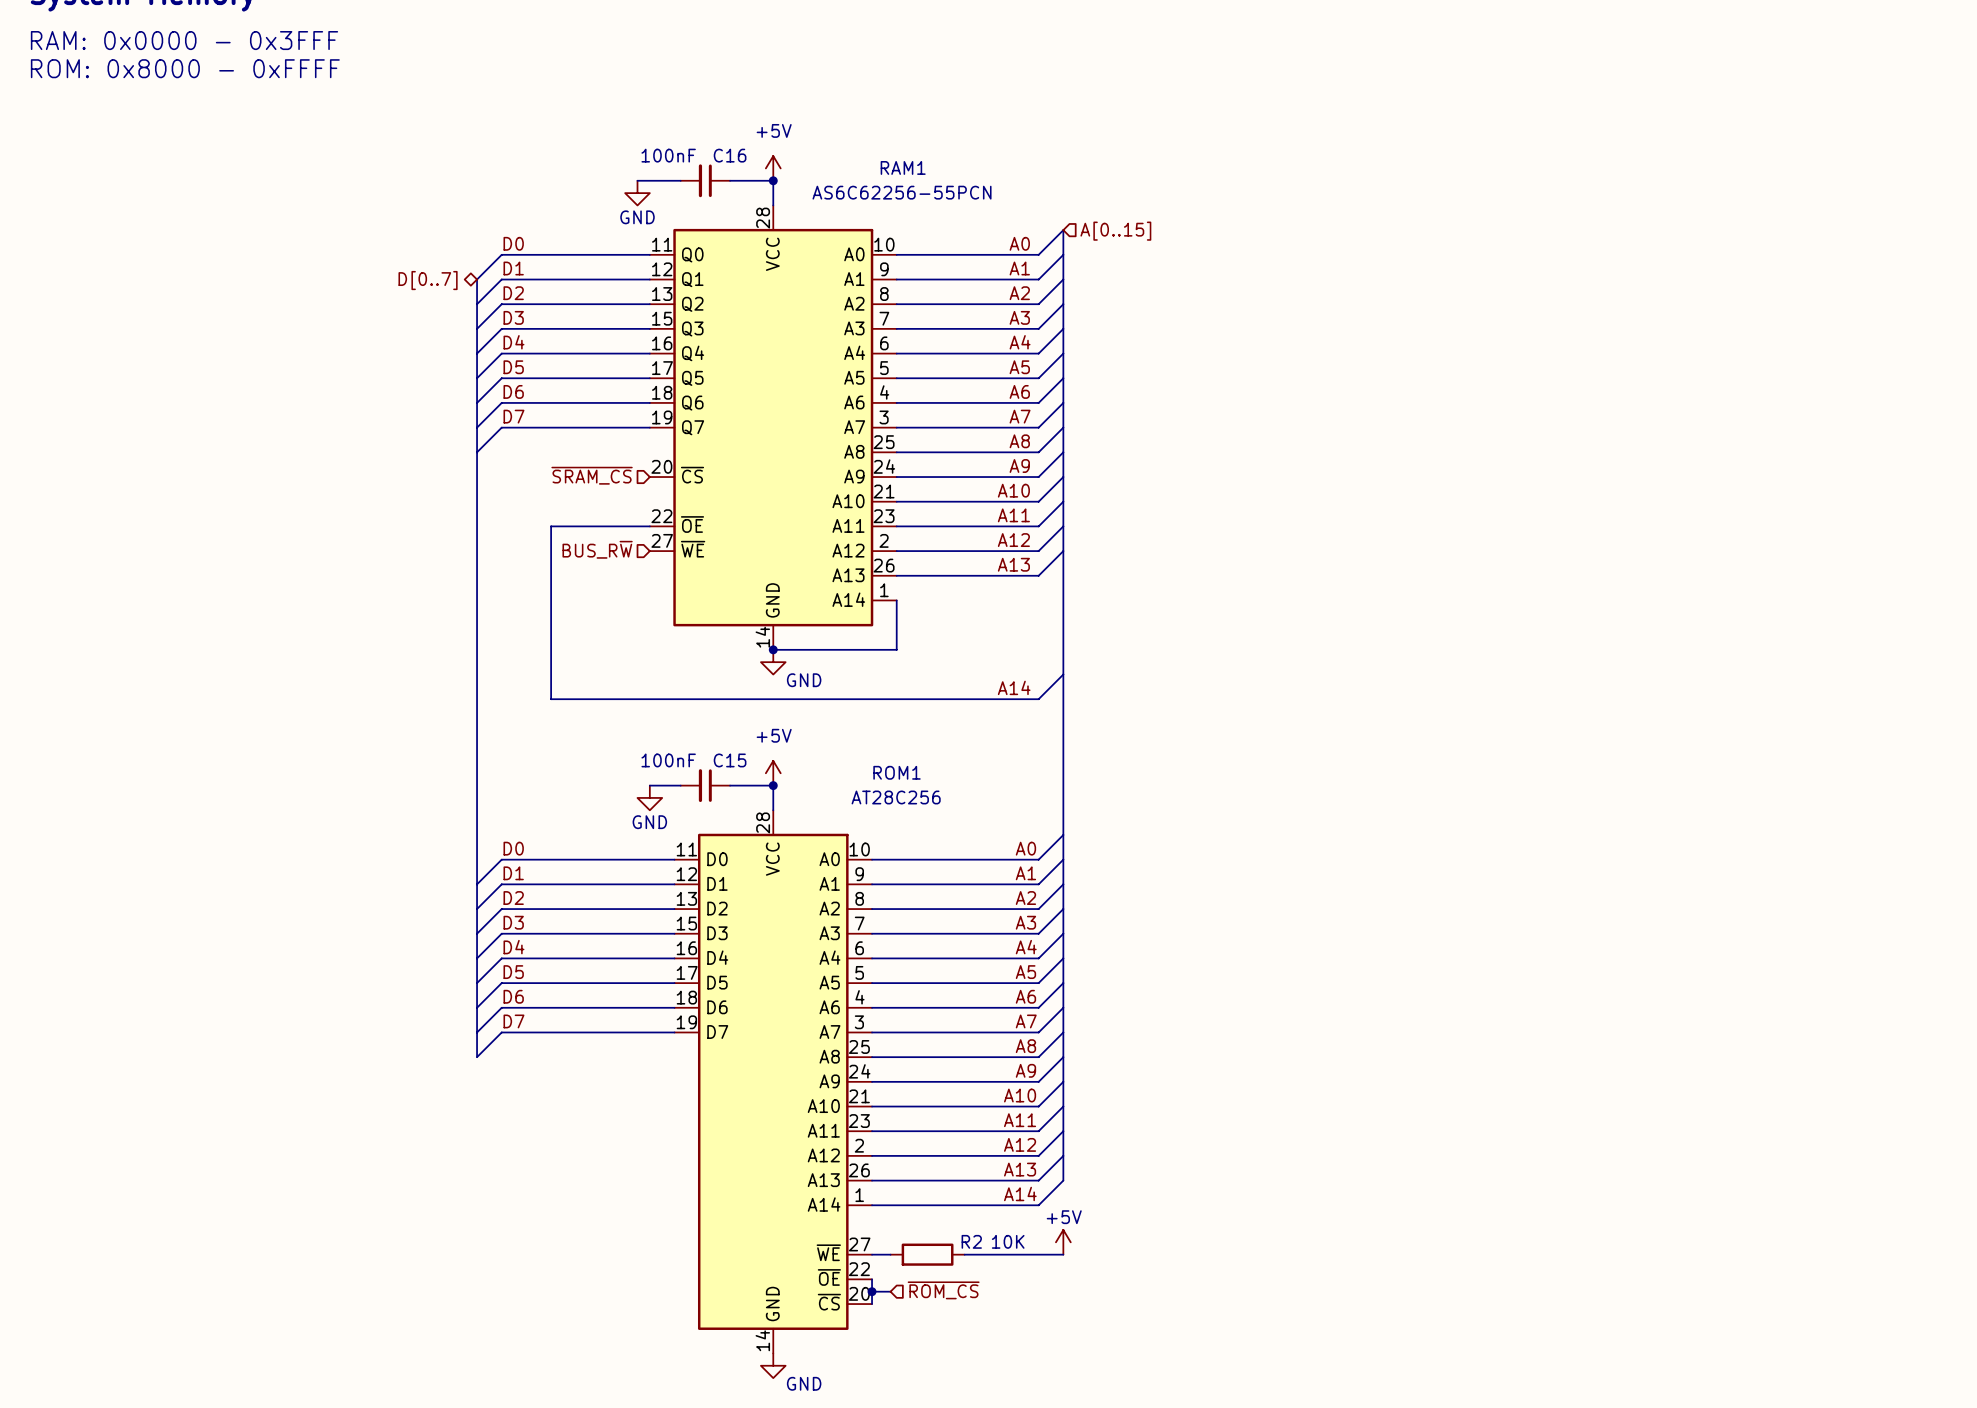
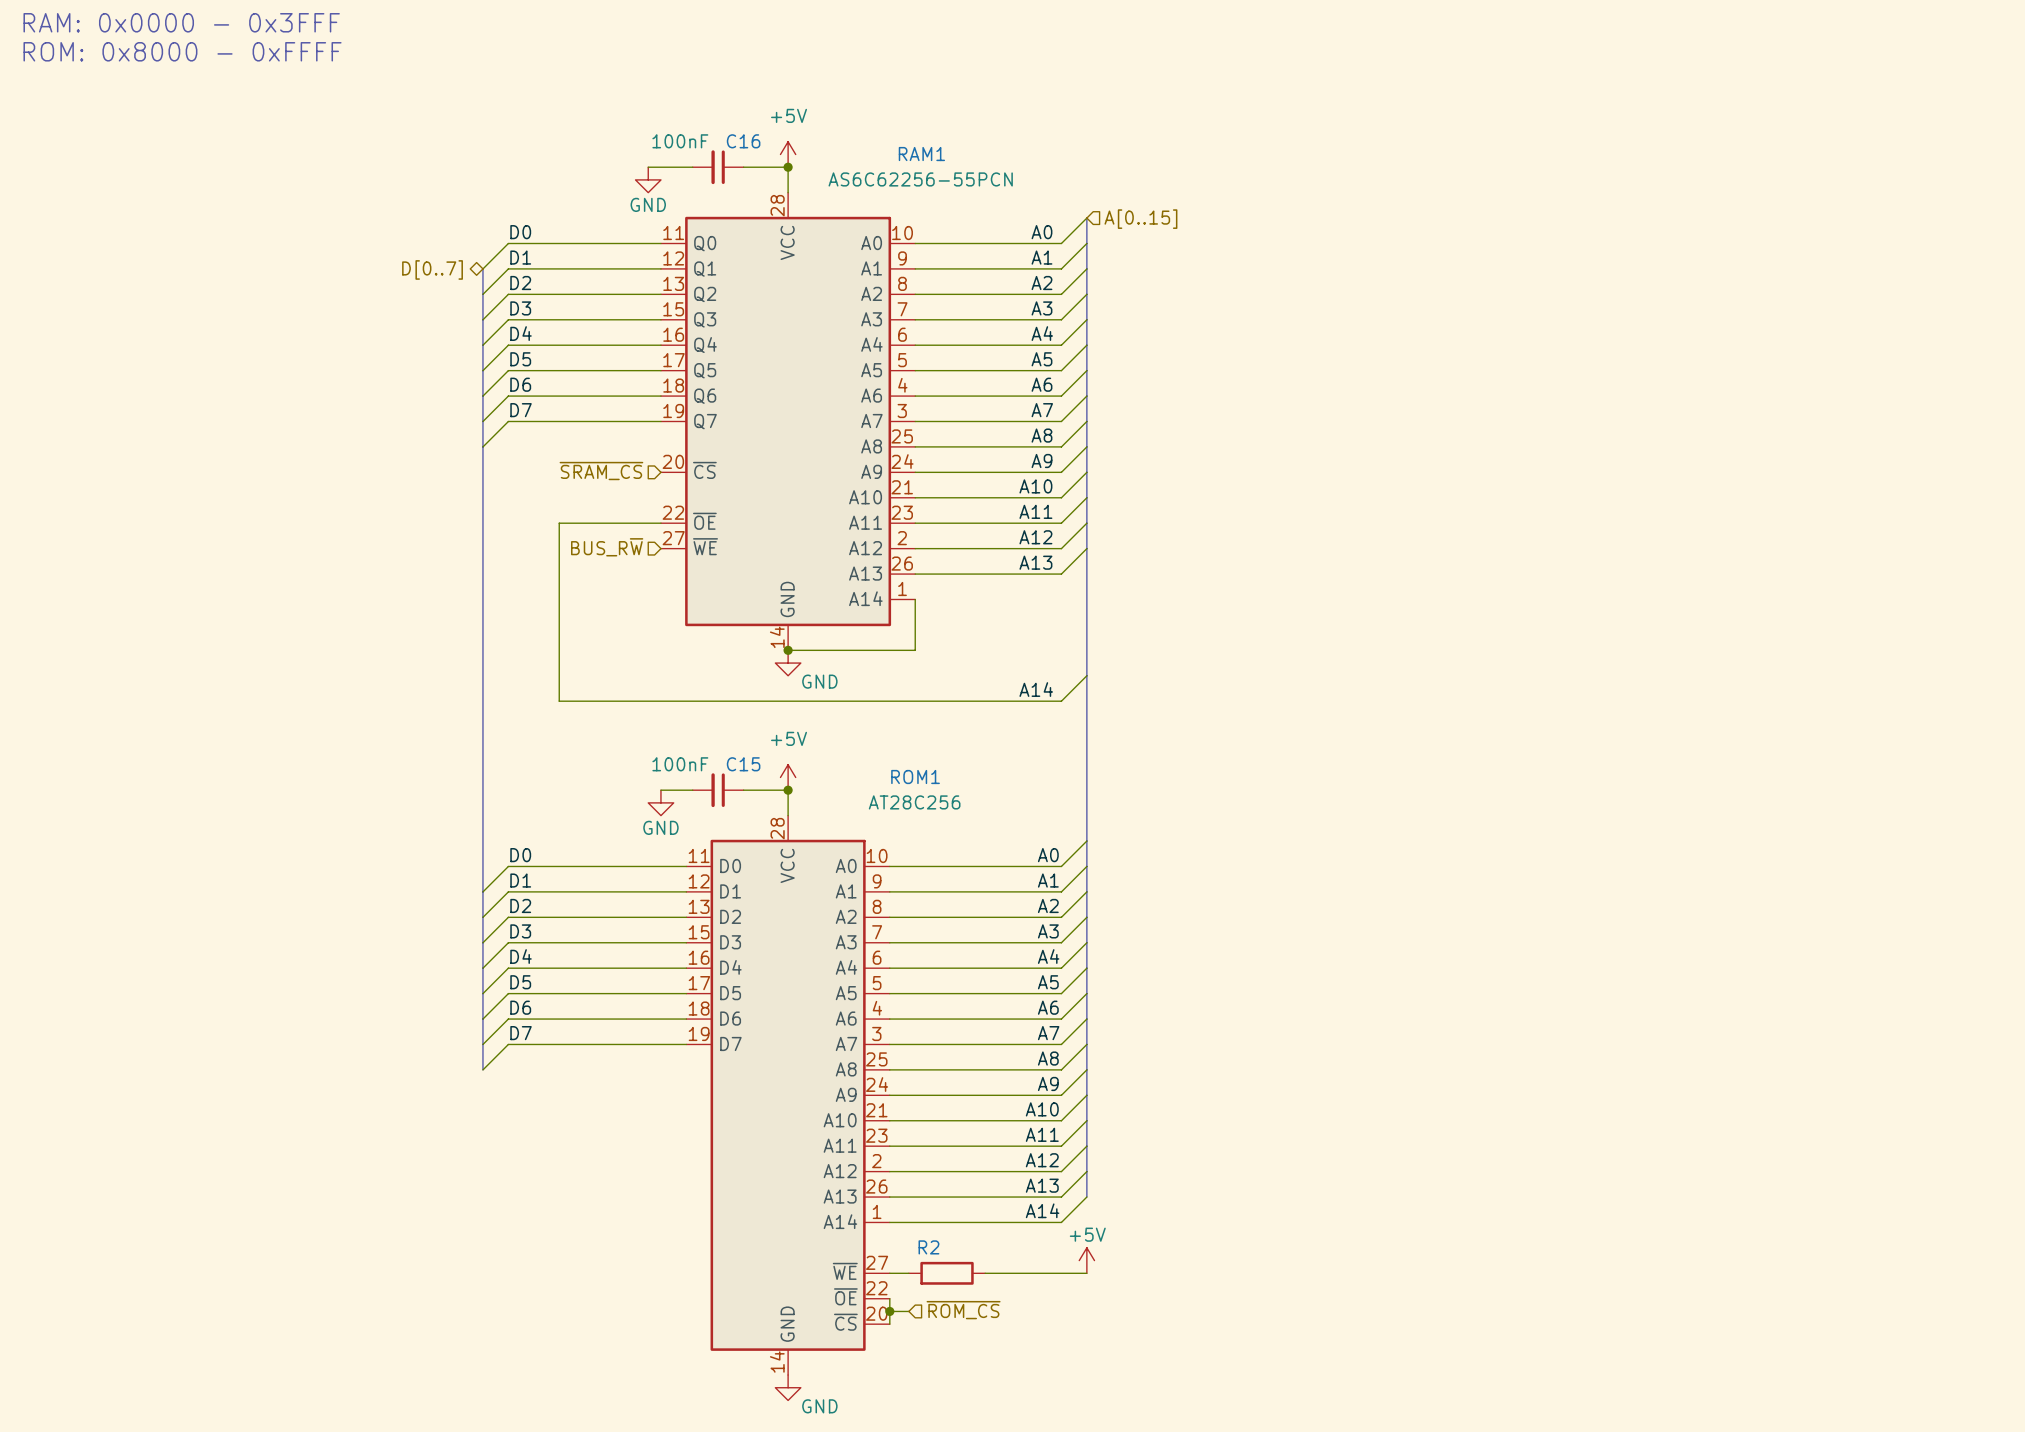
R2 name position: R2 (971, 1241) -> R2 (928, 1247)
R2 value: 10K (1008, 1241) -> none

